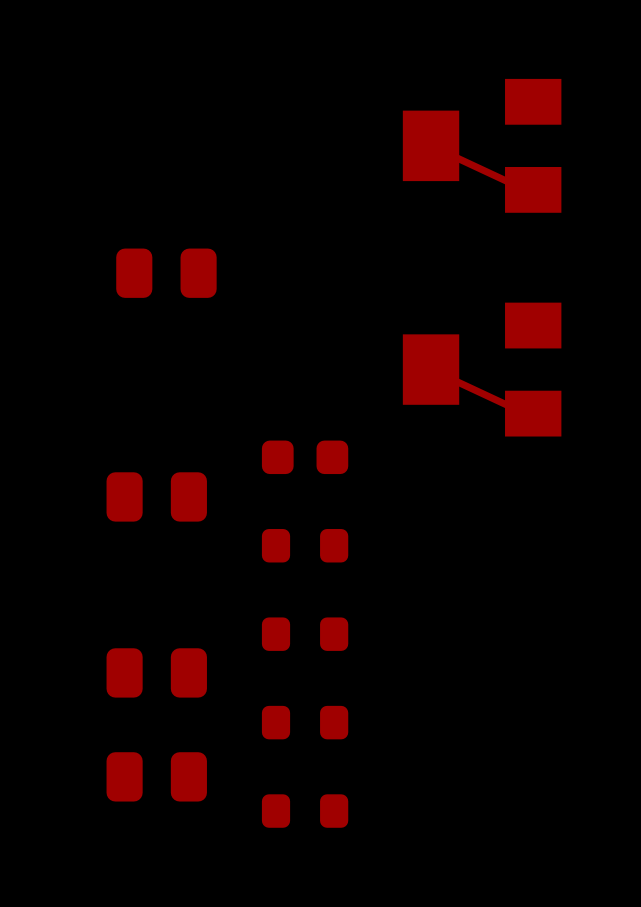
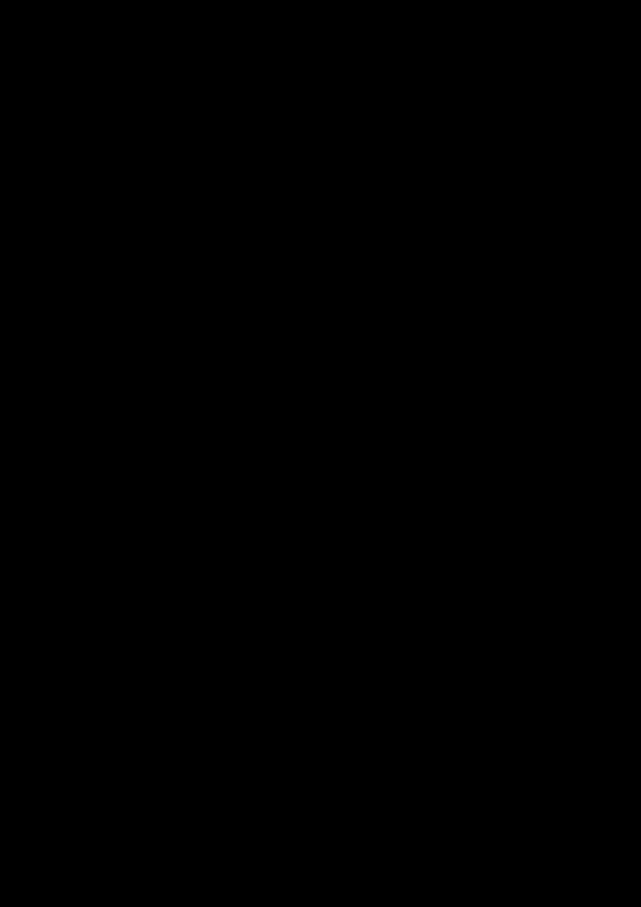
part: (482, 145) -> none
part: (166, 273) -> none
part: (482, 369) -> none
part: (305, 457) -> none
part: (156, 496) -> none
part: (305, 545) -> none
part: (305, 634) -> none
part: (156, 672) -> none
part: (305, 722) -> none
part: (156, 776) -> none
part: (305, 811) -> none

